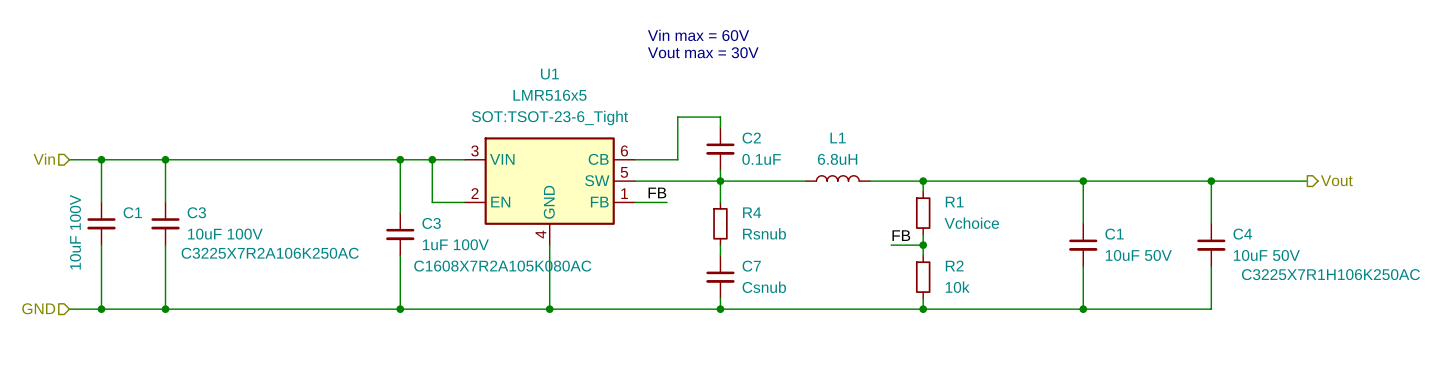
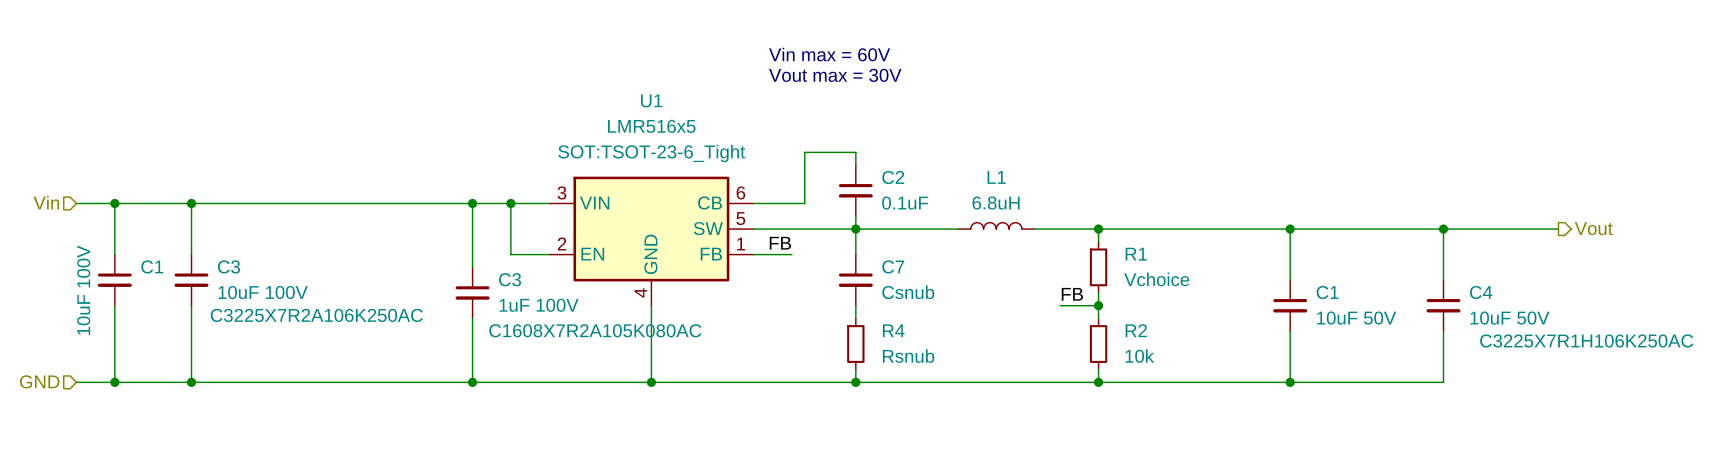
R4 position: (720, 223) -> (855, 344)
C7 position: (720, 277) -> (855, 280)

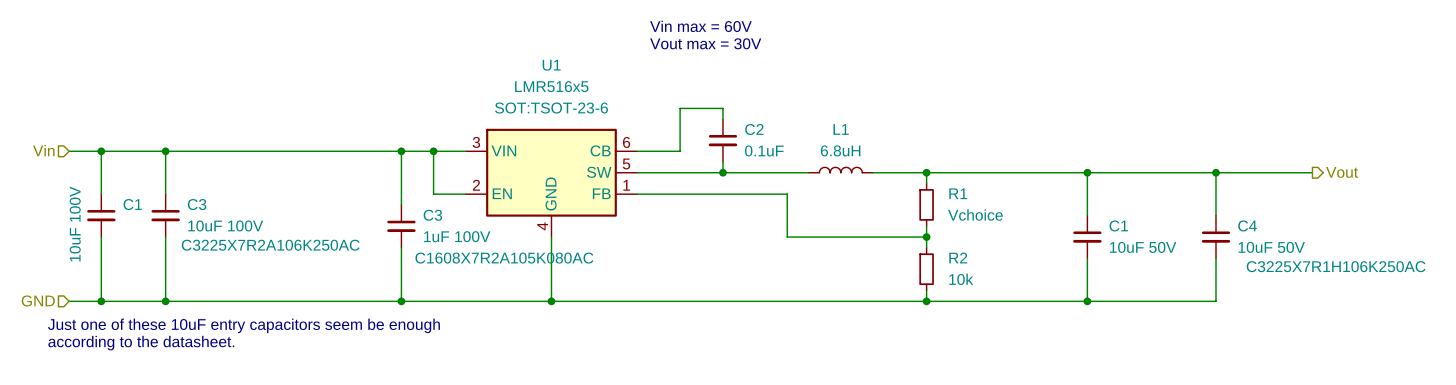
U1 text: SOT:TSOT-23-6_Tight (651, 153) -> SOT:TSOT-23-6 (551, 108)
wire: (855, 229) (855, 254) -> none
label: FB (780, 243) -> none
wire: none -> (669, 194) (787, 194) (787, 237) (894, 237)
C7: Csnub (855, 280) -> none
label: FB (1072, 294) -> none
wire: (855, 305) (855, 318) -> none
R4: Rsnub (855, 344) -> none
wire: (855, 369) (855, 382) -> none
junction: (855, 382) -> none
text: none -> Just one of these 10uF entry capacitors seem be enough (243, 325)
text: none -> according to the datasheet. (141, 343)

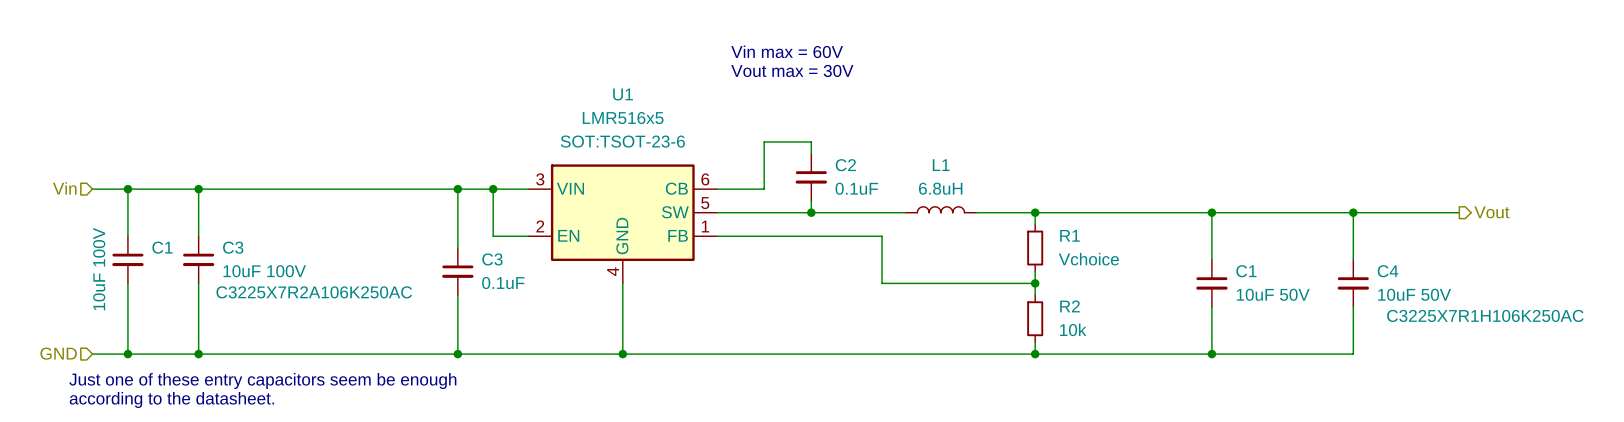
C3 value: 1uF 100V (457, 236) -> 0.1uF (503, 283)
C3 text: C1608X7R2A105K080AC (504, 258) -> none
text: Just one of these 10uF entry capacitors seem be enough (243, 325) -> Just one of these entry capacitors seem be enough (262, 381)

